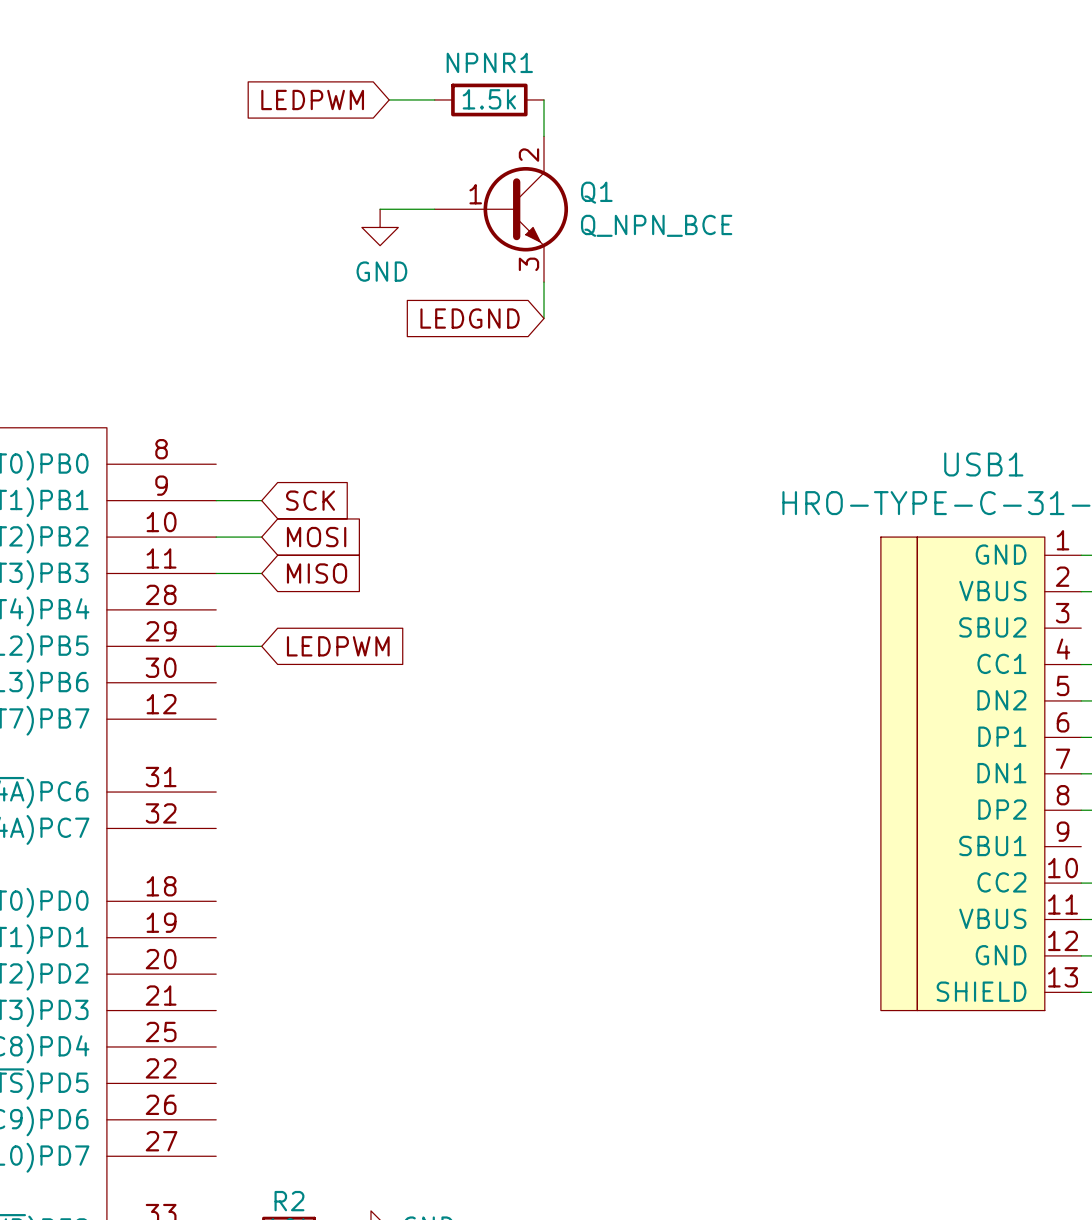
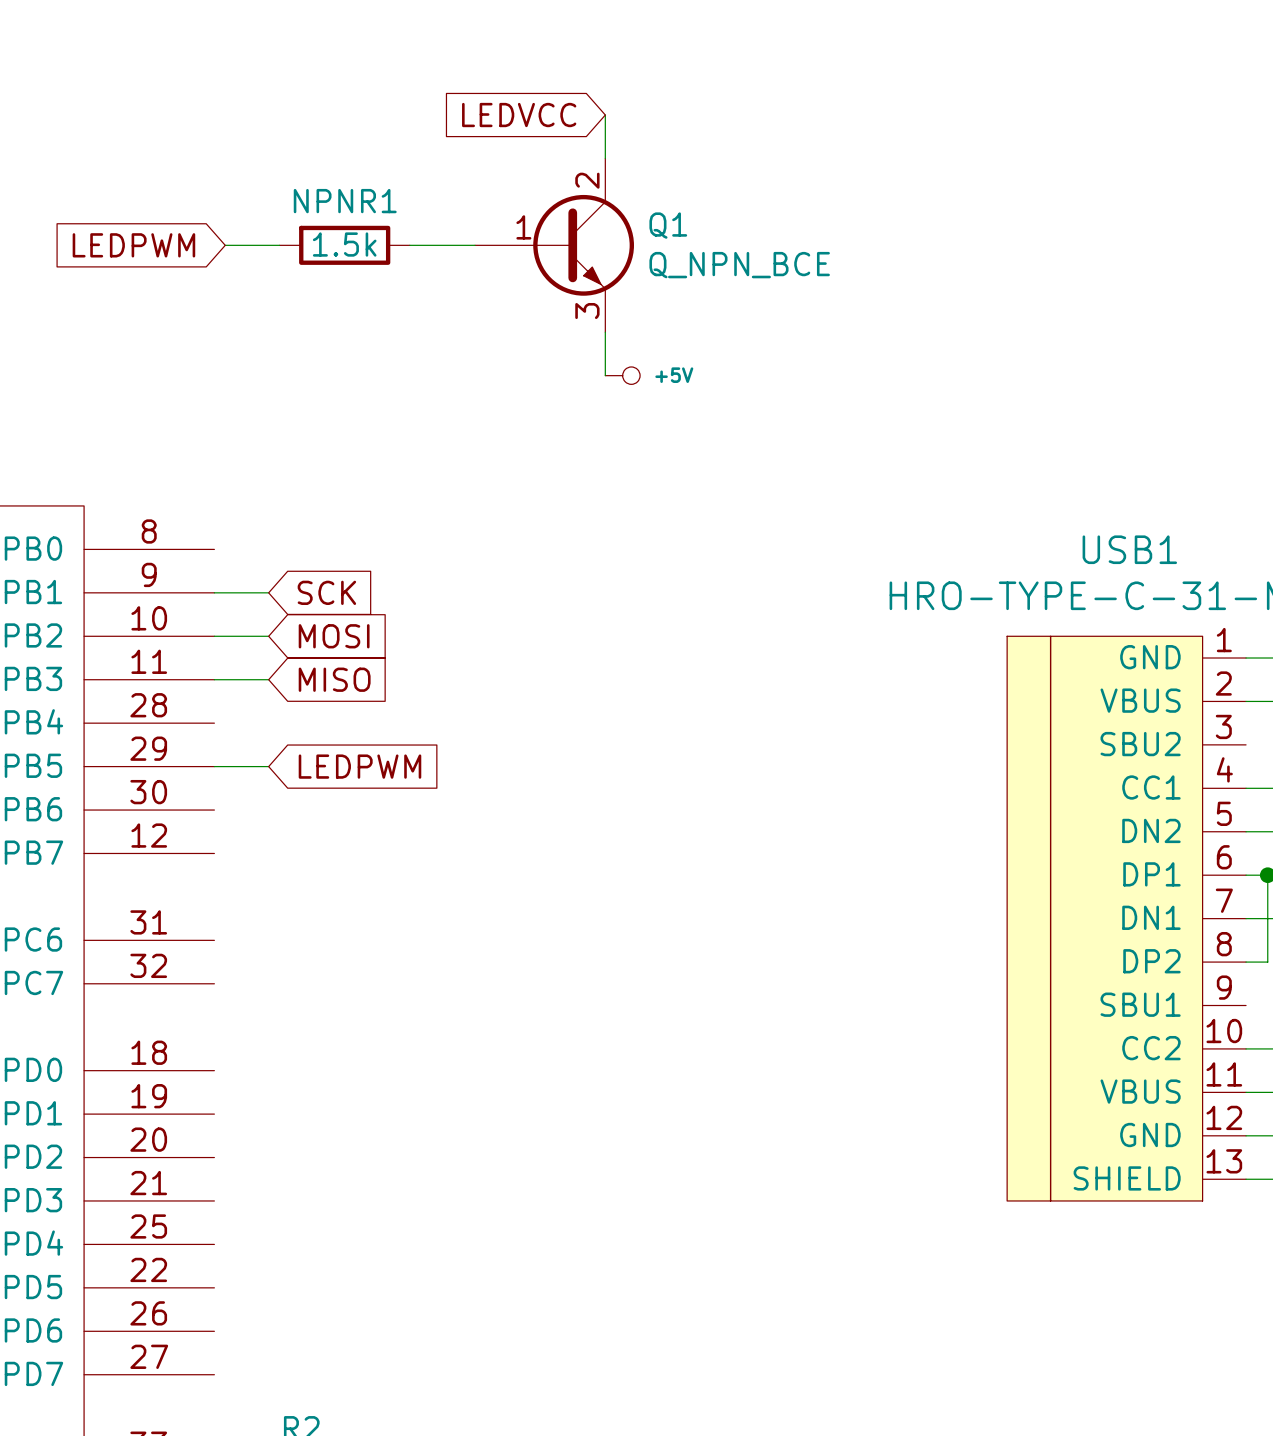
global label position: LEDPWM (312, 99) -> LEDPWM (133, 245)
wire: (389, 99) (434, 99) -> (225, 245) (279, 245)
global label: none -> LEDVCC (519, 115)
NPNR1 position: (489, 99) -> (344, 245)
power symbol: GND (380, 227) -> none
global label: LEDGND (470, 318) -> none
power symbol: none -> +5V (622, 375)

